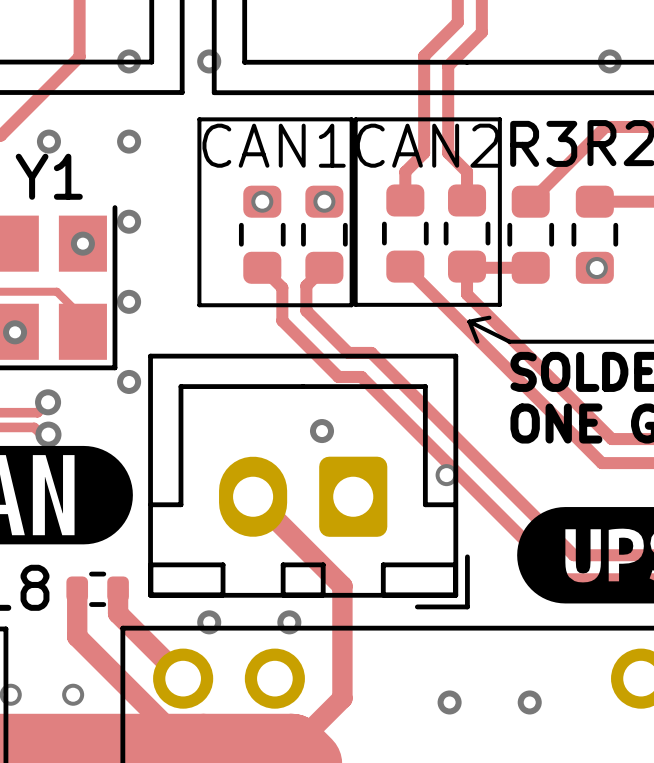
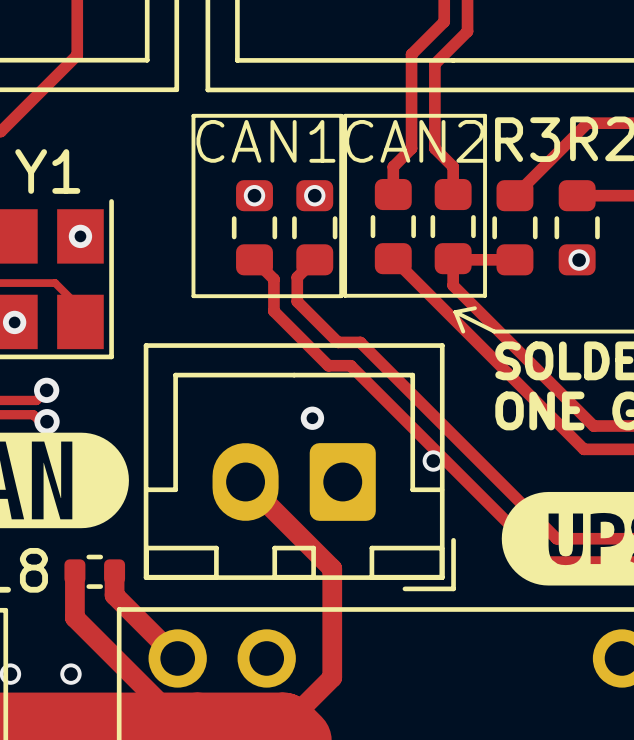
via: (129, 61) -> none
via: (209, 61) -> none
via: (609, 61) -> none
via: (48, 141) -> none
via: (129, 141) -> none
via: (129, 221) -> none
via: (129, 301) -> none
via: (129, 381) -> none
via: (209, 622) -> none
via: (289, 622) -> none
via: (449, 702) -> none
via: (529, 702) -> none

